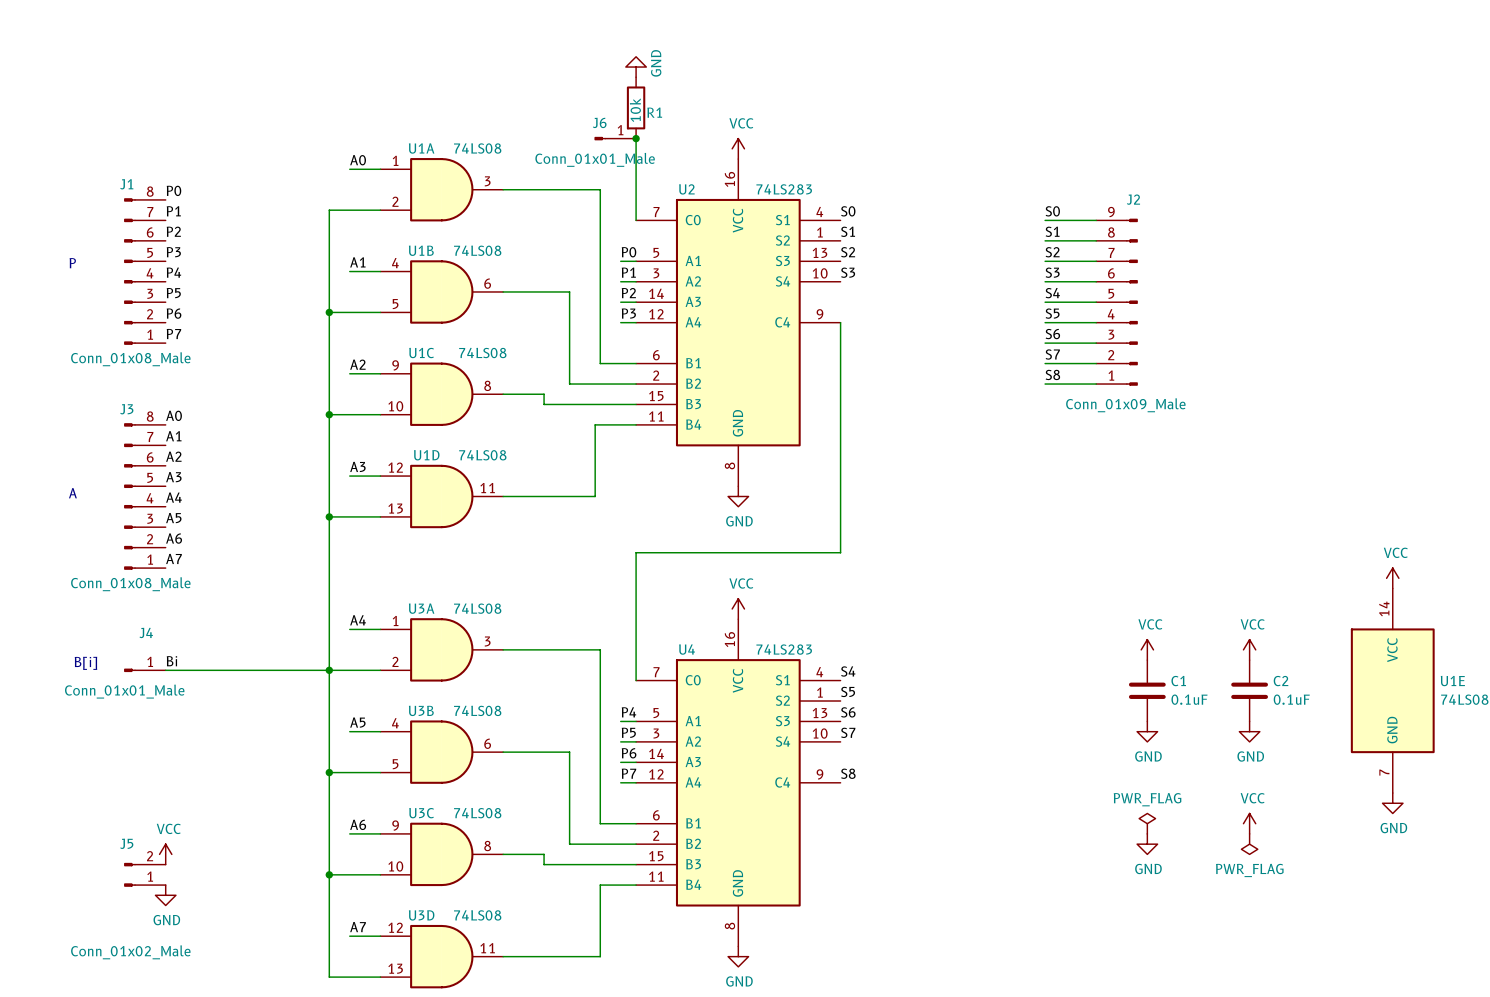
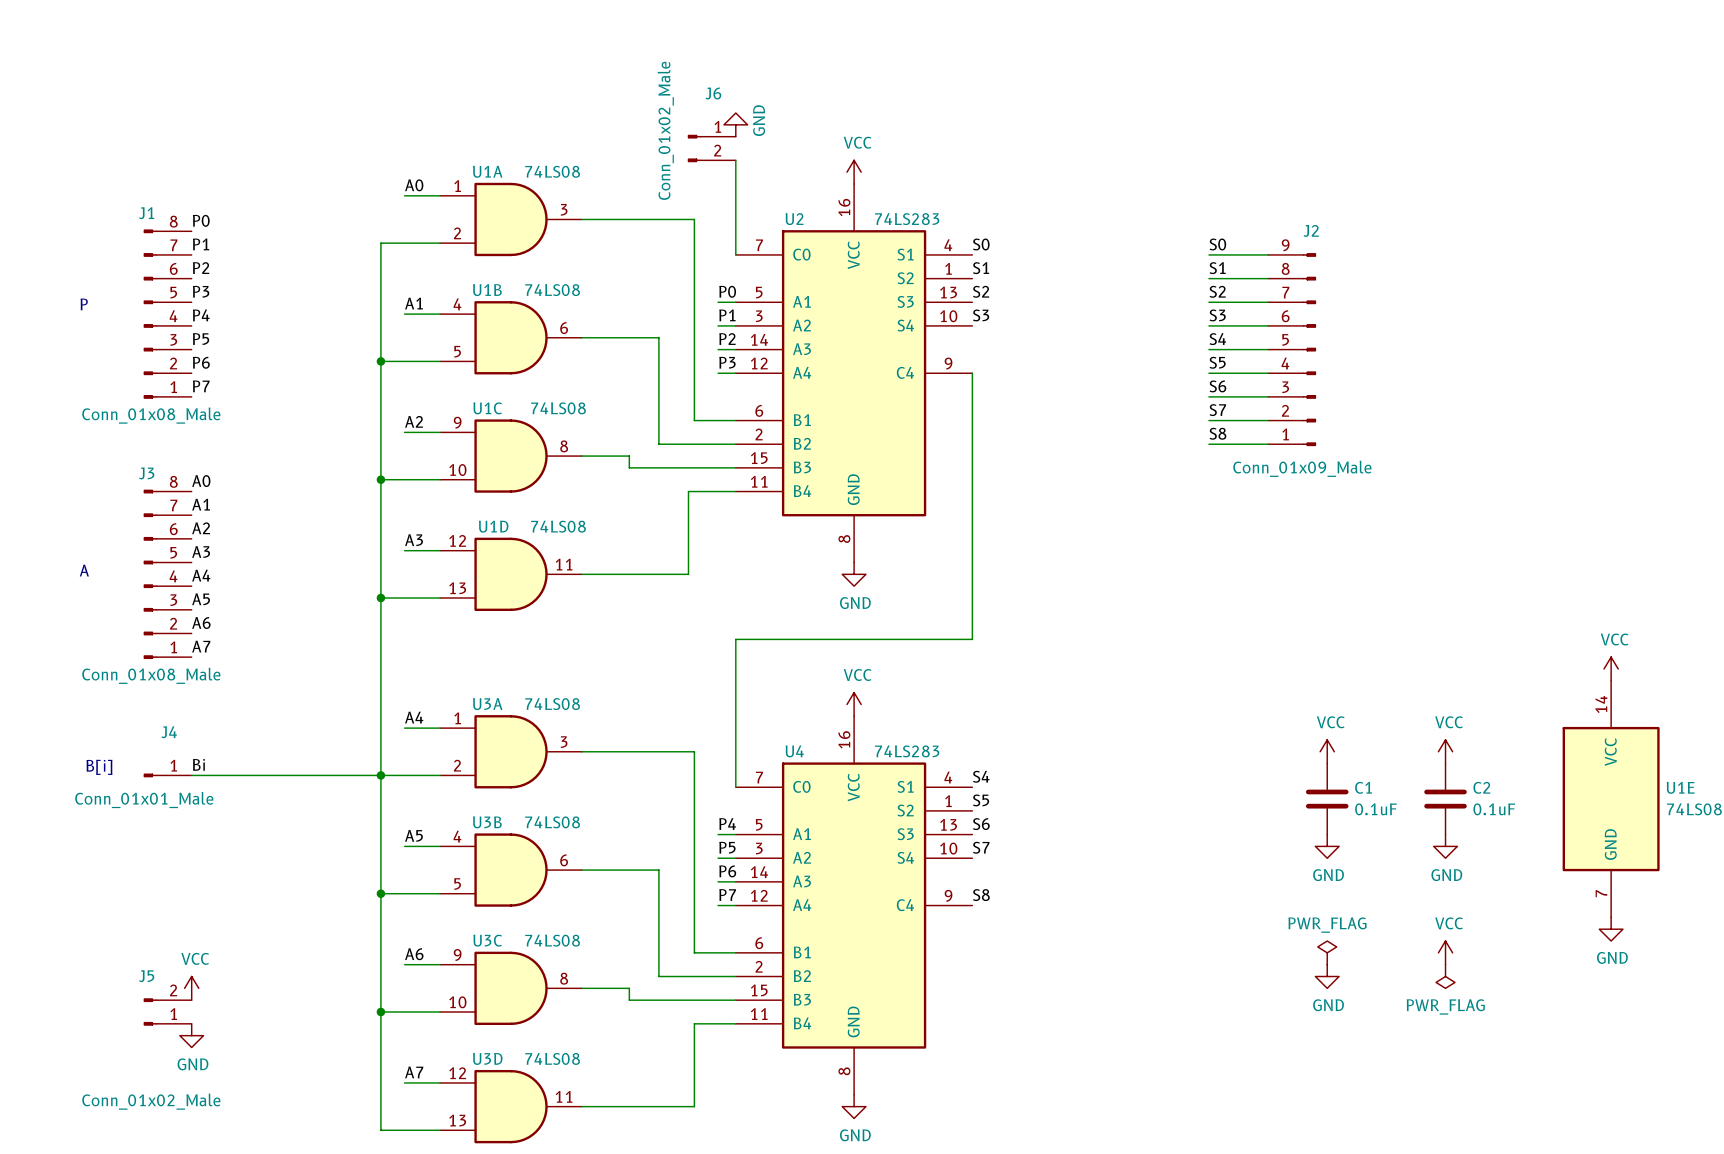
power symbol position: GND (636, 67) -> GND (735, 124)
R1: 10k (636, 107) -> none
J6 name position: J6 (599, 122) -> J6 (713, 93)
J6 symbol: [594, 136, 637, 141] -> [687, 134, 736, 163]
junction: (636, 138) -> none
J6 value: Conn_01x01_Male (595, 159) -> Conn_01x02_Male (665, 130)

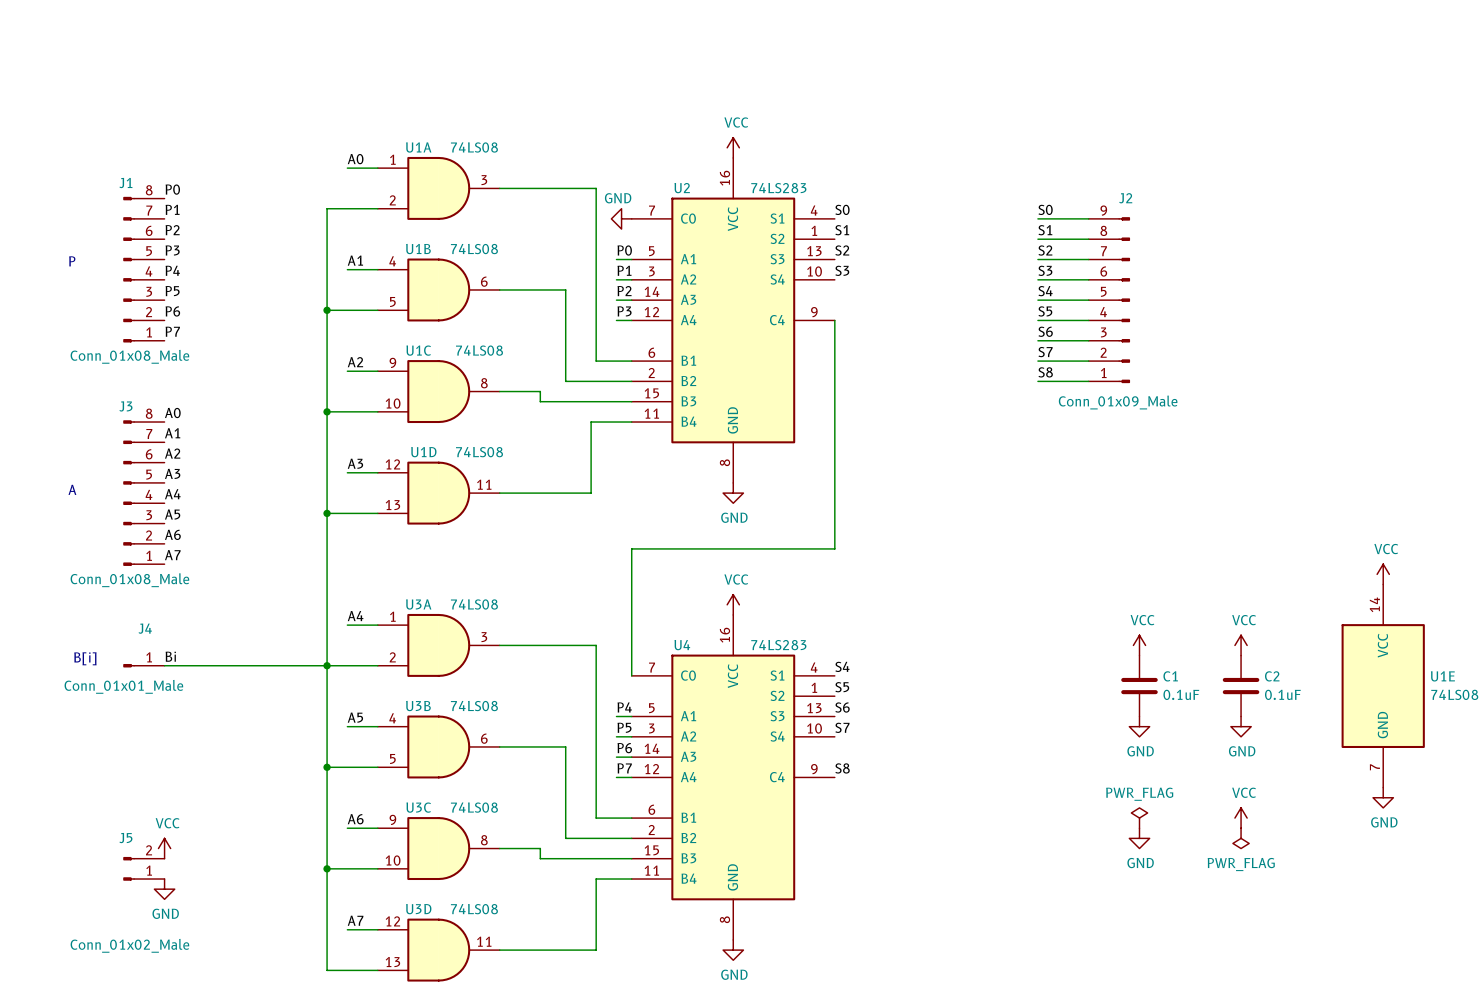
power symbol rotation: 0° (735, 124) -> 90° counterclockwise (621, 218)
power symbol position: GND (735, 124) -> GND (621, 218)
J6: Conn_01x02_Male (711, 148) -> none
wire: (735, 160) (735, 254) -> none

